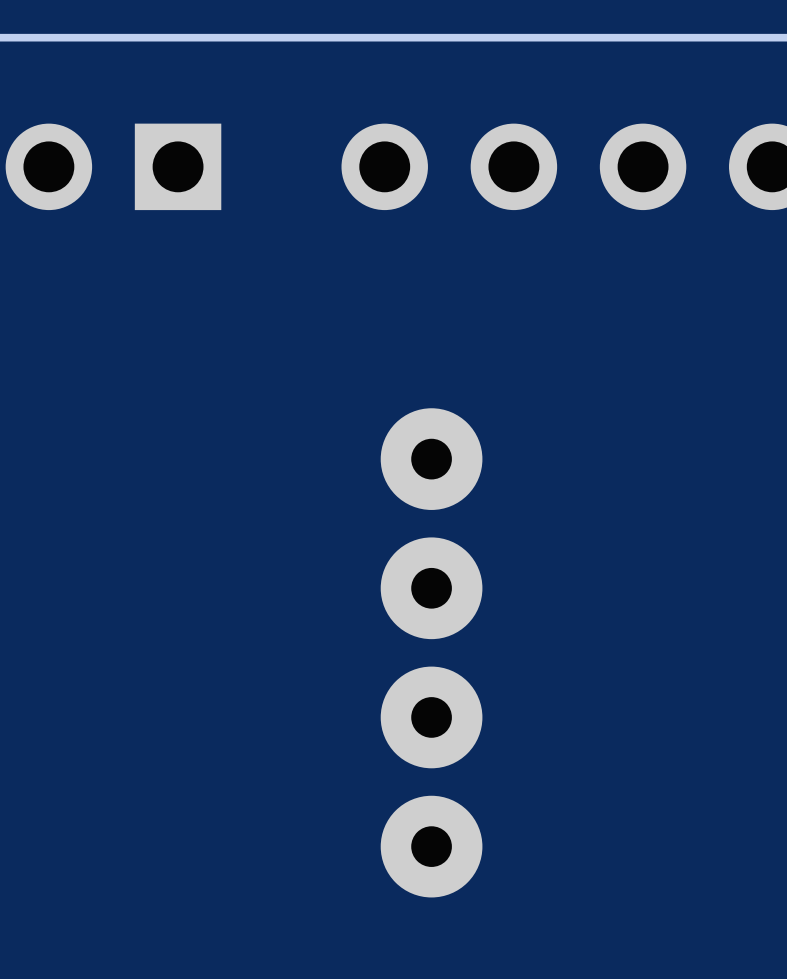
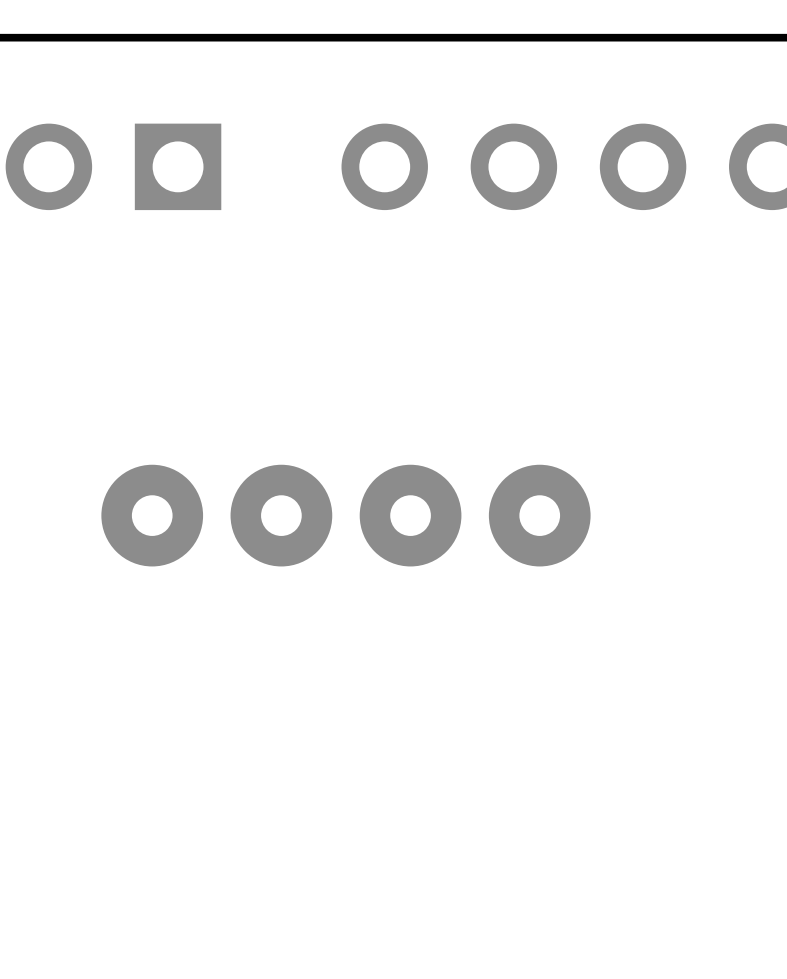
part rotation: 0° (431, 652) -> 90° clockwise (345, 515)

